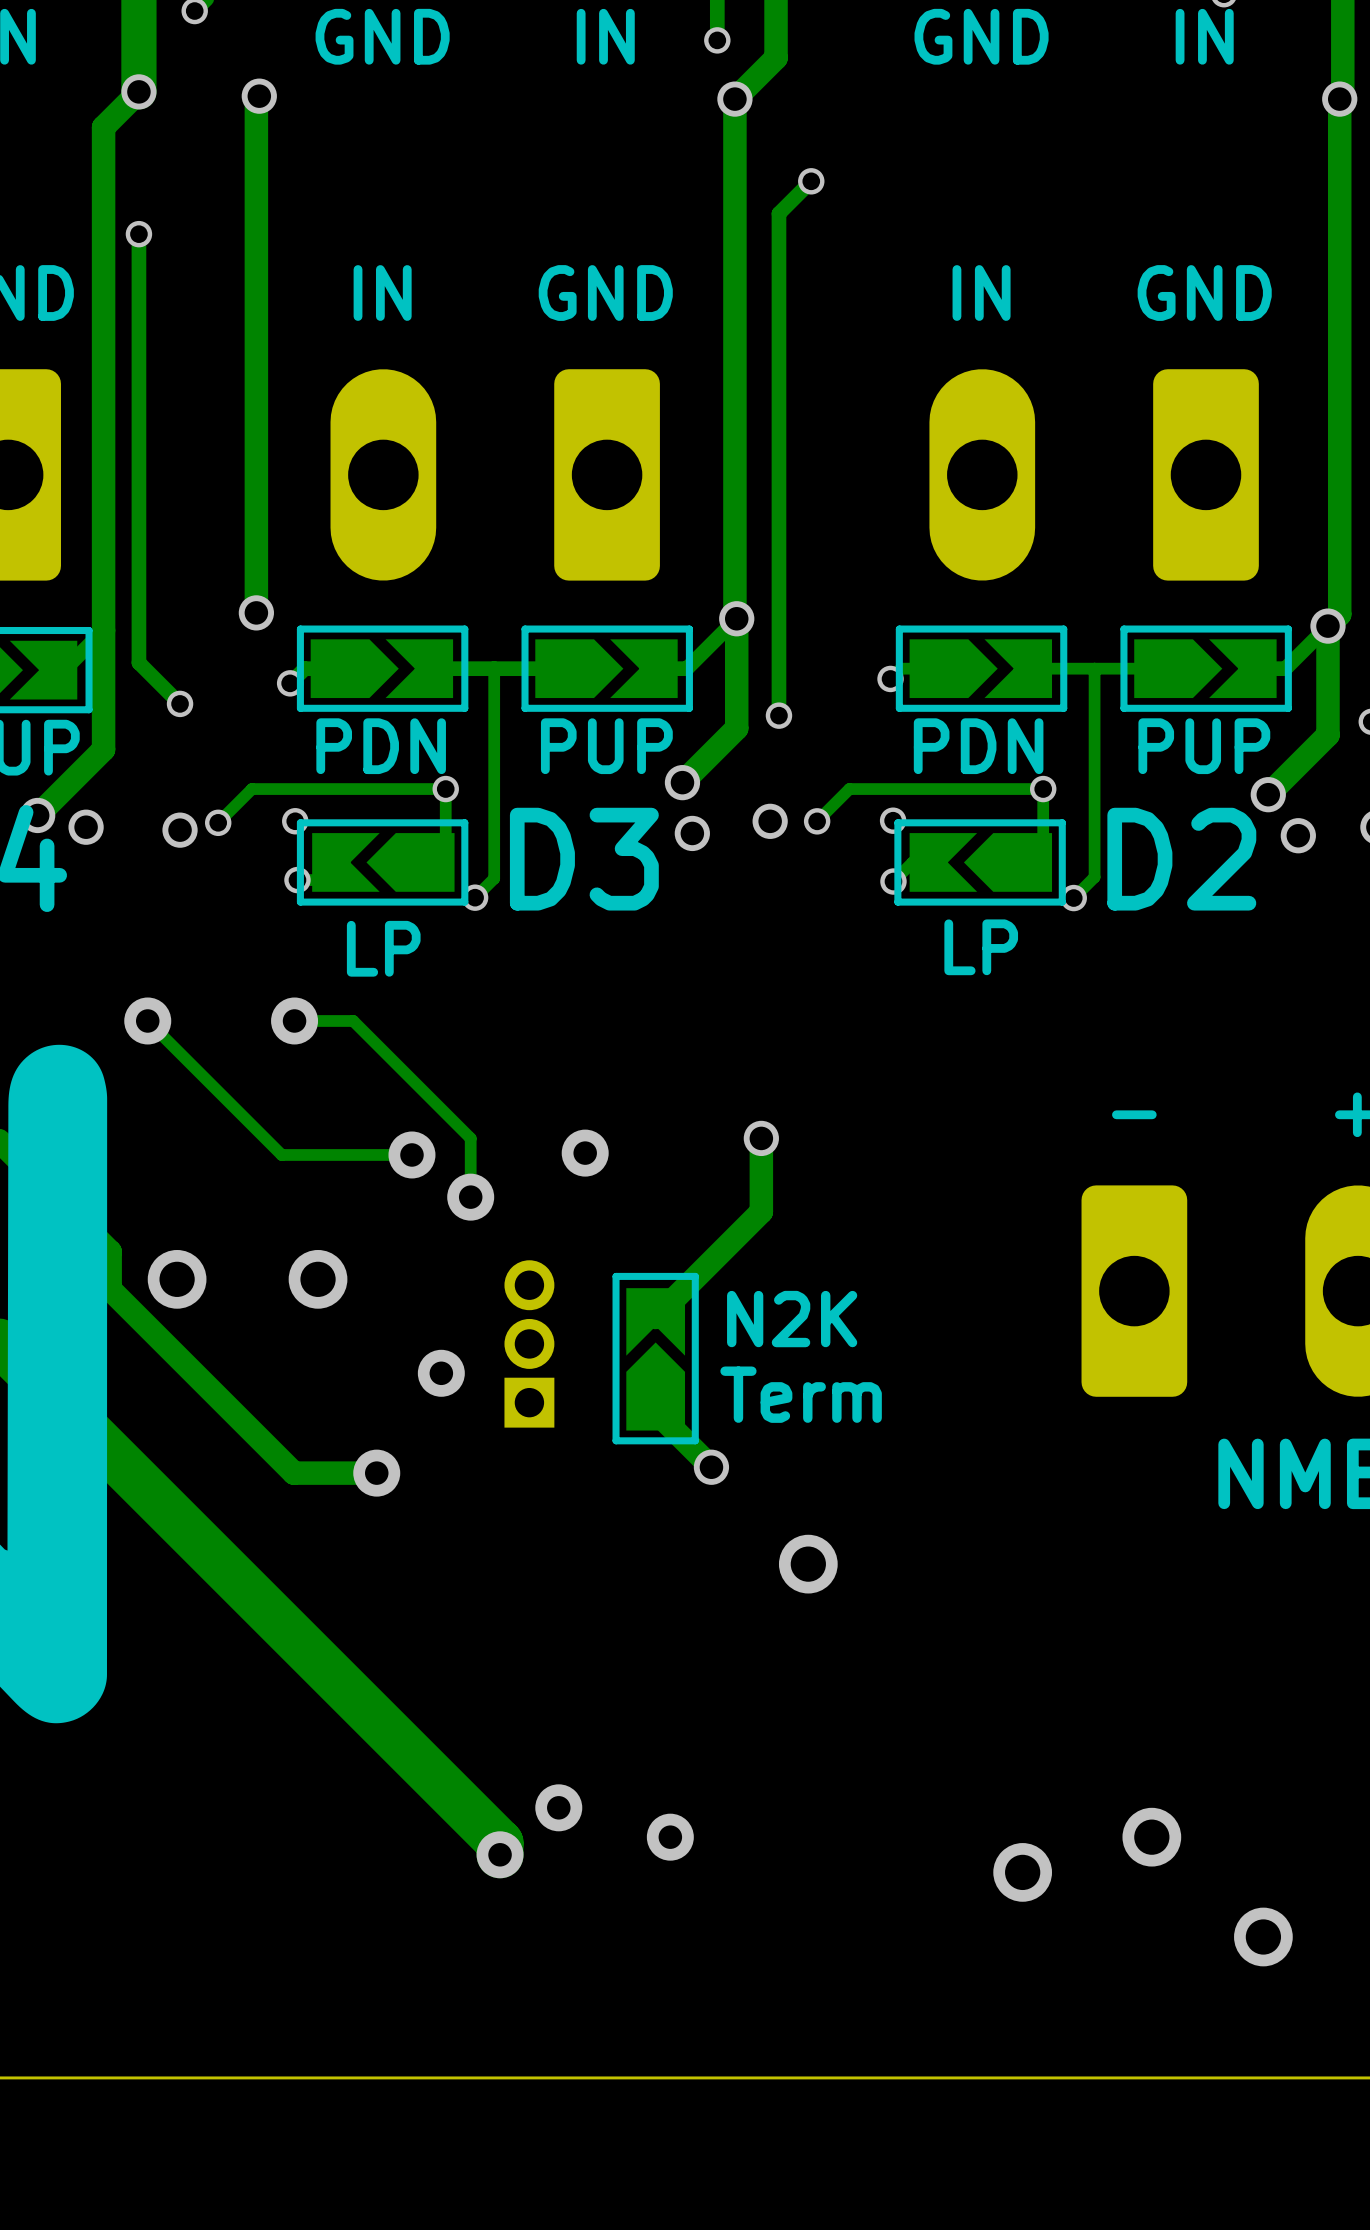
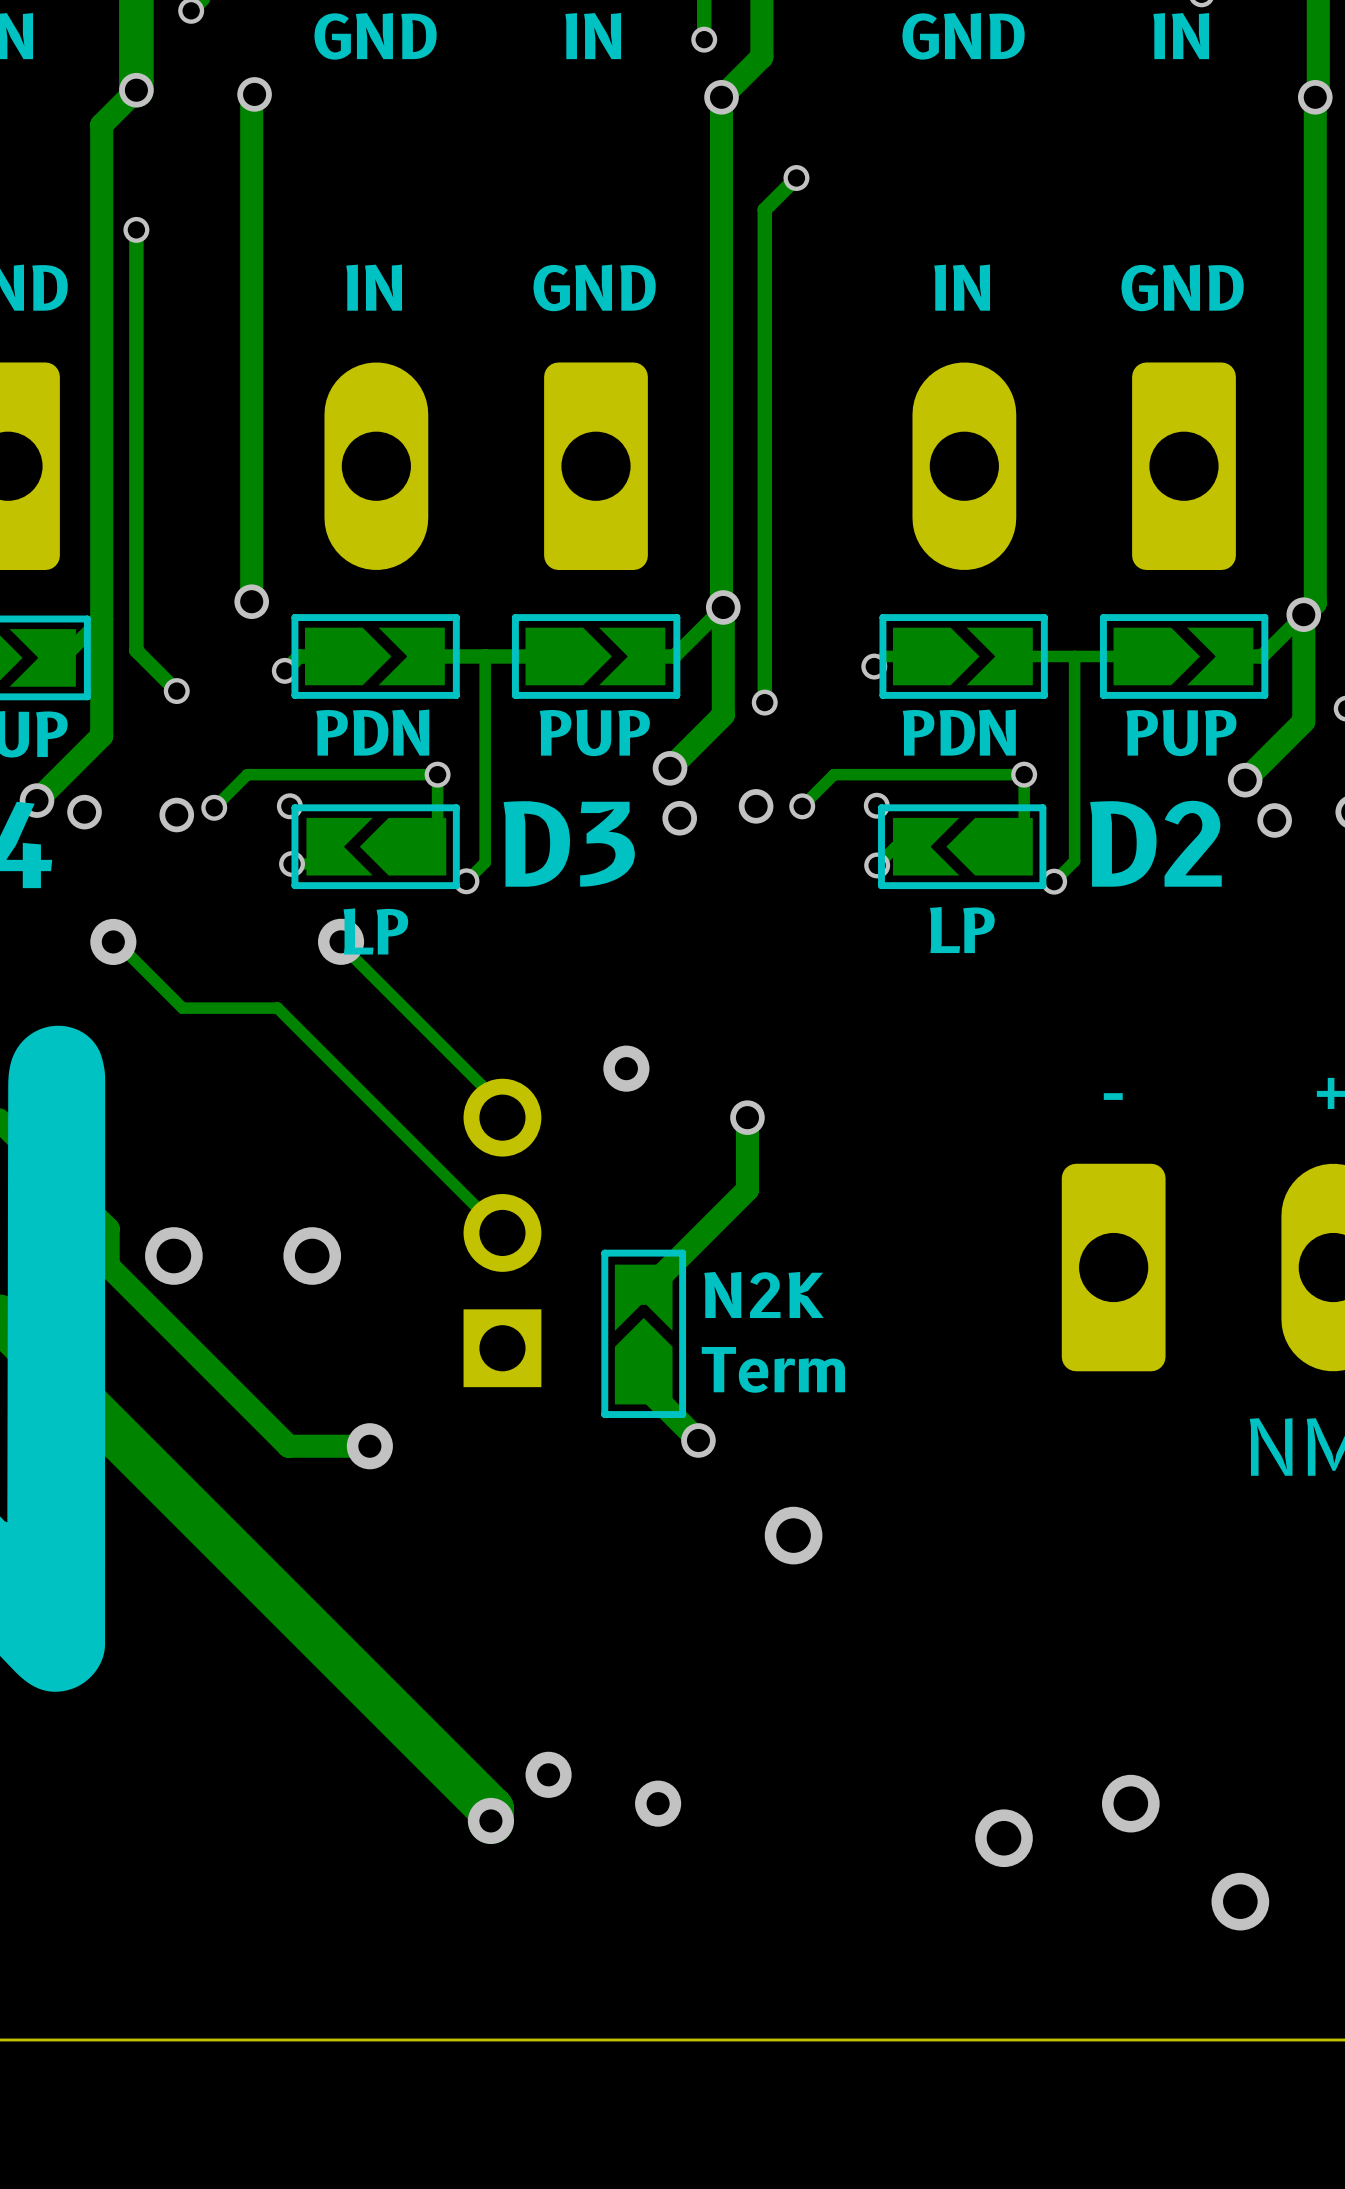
track: none -> (113, 941) (116, 941) (182, 1008) (277, 1008) (502, 1232)
track: none -> (341, 941) (341, 944) (502, 1106) (502, 1117)
track: (147, 1020) (281, 1154) (411, 1154) -> none
via position: (147, 1020) -> (113, 941)
track: (294, 1020) (353, 1020) (470, 1138) (470, 1197) -> none
via position: (294, 1020) -> (341, 941)
via position: (585, 1153) -> (626, 1068)
via: (411, 1154) -> none
via: (470, 1197) -> none
part: none -> (502, 1232)
part: (529, 1343) -> none
via: (441, 1373) -> none

